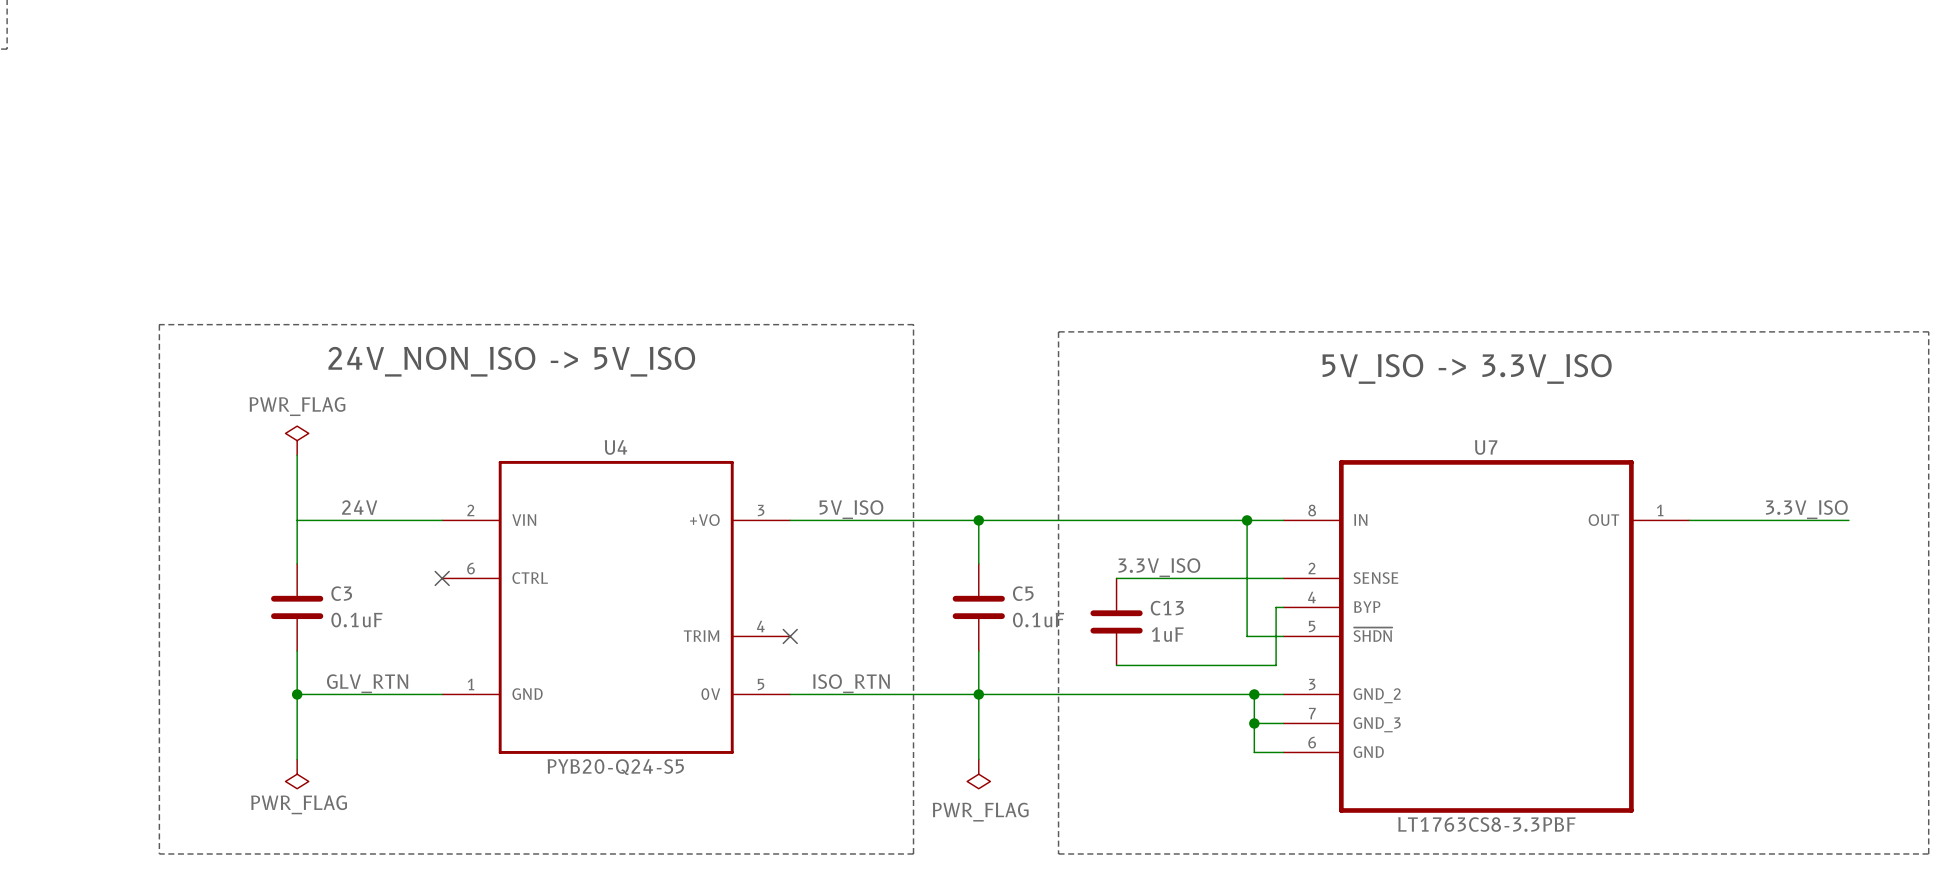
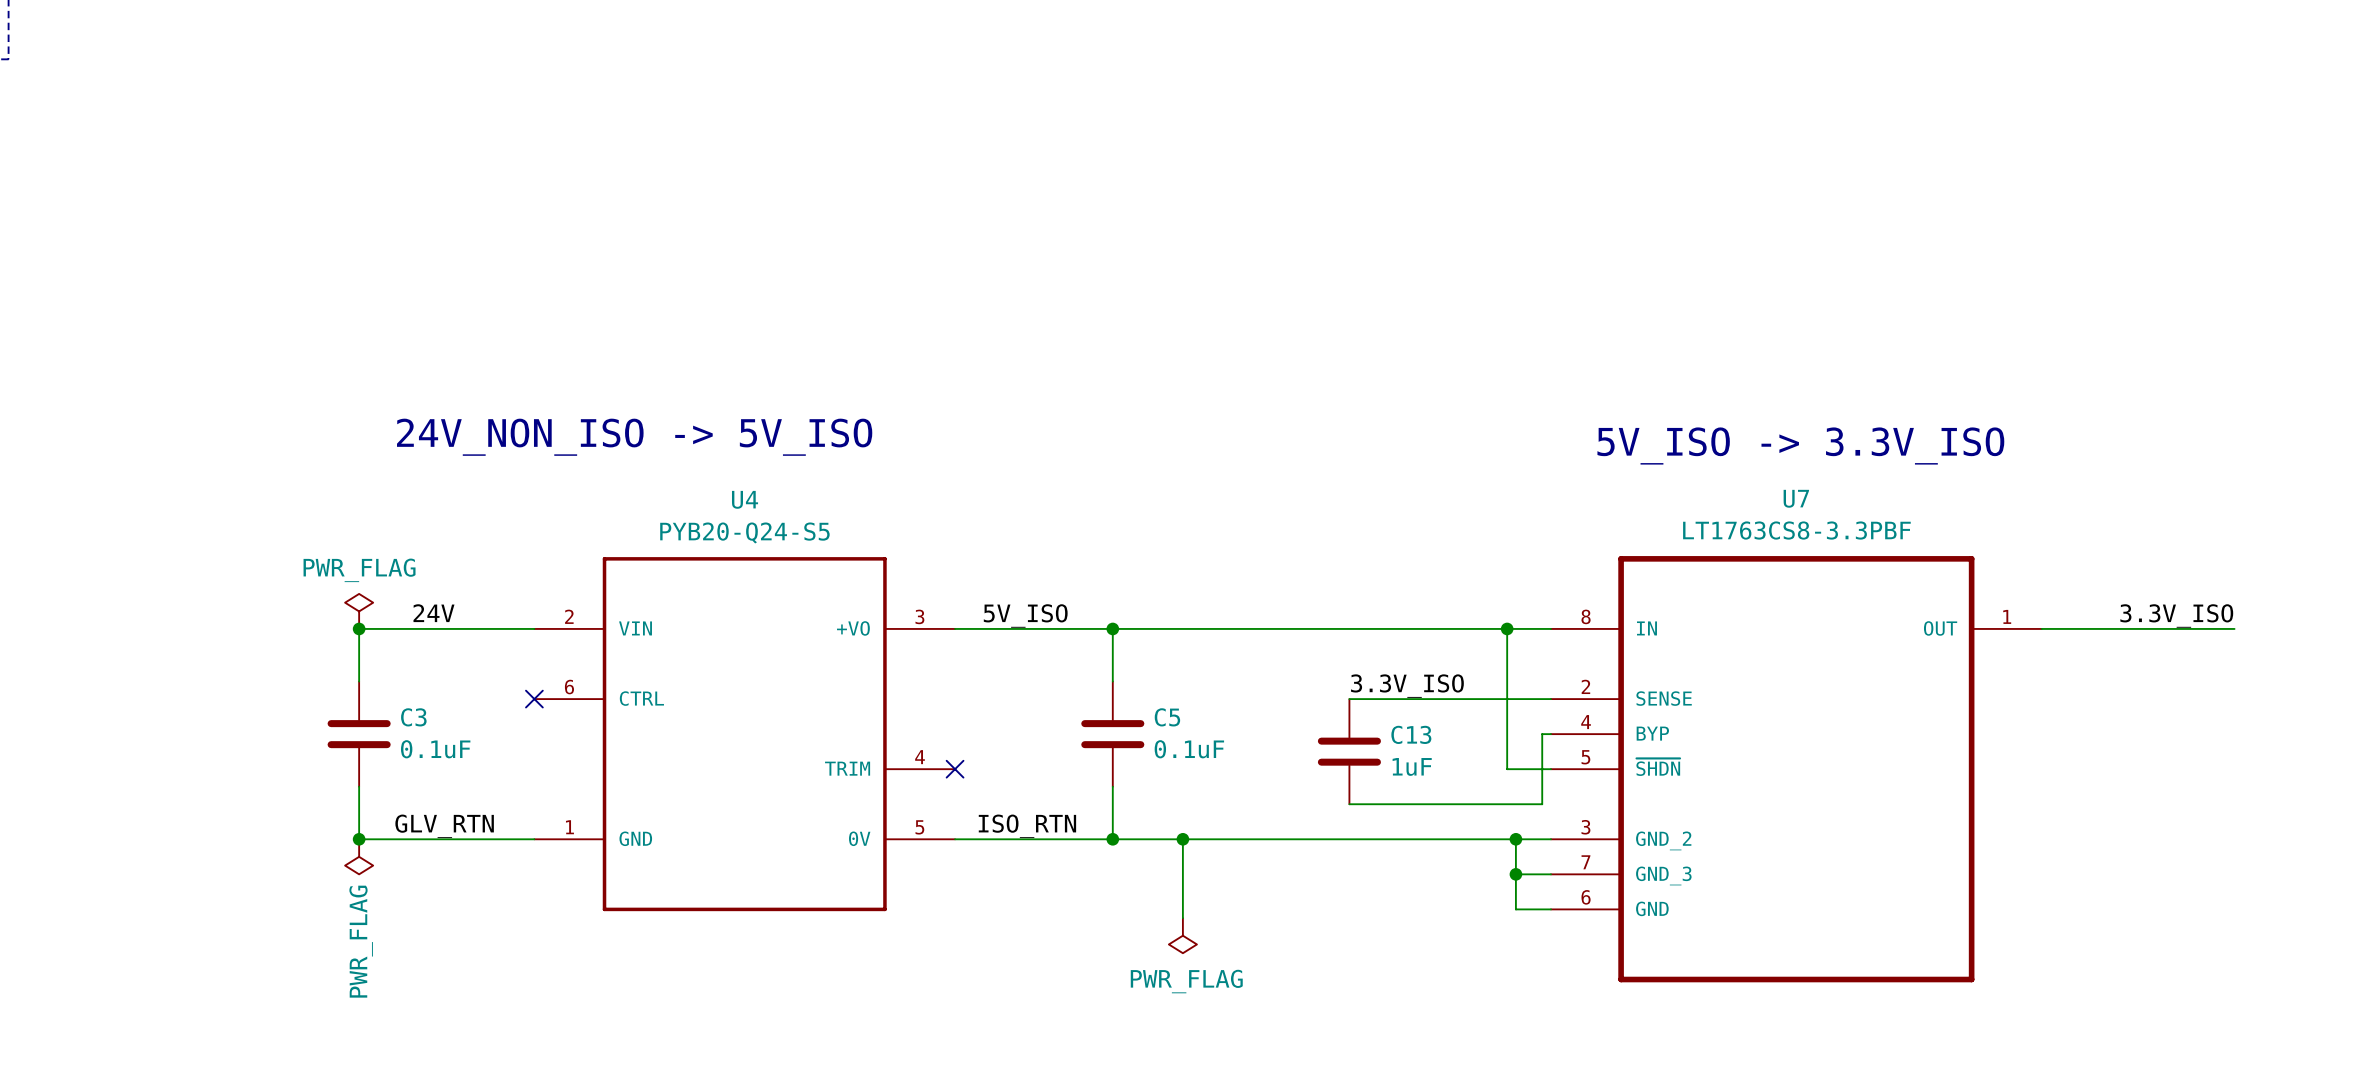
line: (159, 324) (913, 324) (913, 853) (159, 853) (159, 324) -> none
line: (1058, 331) (1928, 331) (1928, 853) (1058, 853) (1058, 331) -> none
power symbol position: PWR_FLAG (297, 440) -> PWR_FLAG (359, 611)
U4 name position: U4 (615, 447) -> U4 (745, 499)
U7 name position: U7 (1486, 447) -> U7 (1796, 498)
wire: (297, 455) (297, 520) -> none
junction: none -> (359, 628)
wire: (978, 520) (978, 563) -> (1112, 628) (1112, 681)
junction position: (978, 520) -> (1112, 628)
C5 position: (978, 607) -> (1112, 734)
wire: (978, 650) (978, 694) -> (1112, 786) (1112, 839)
wire: (297, 694) (297, 759) -> none
junction: none -> (1112, 839)
U4 value position: PYB20-Q24-S5 (615, 767) -> PYB20-Q24-S5 (744, 532)
power symbol position: PWR_FLAG (297, 774) -> PWR_FLAG (359, 856)
power symbol text rotation: 0° (299, 804) -> 90° counterclockwise (361, 941)
U7 value position: LT1763CS8-3.3PBF (1486, 824) -> LT1763CS8-3.3PBF (1796, 530)

